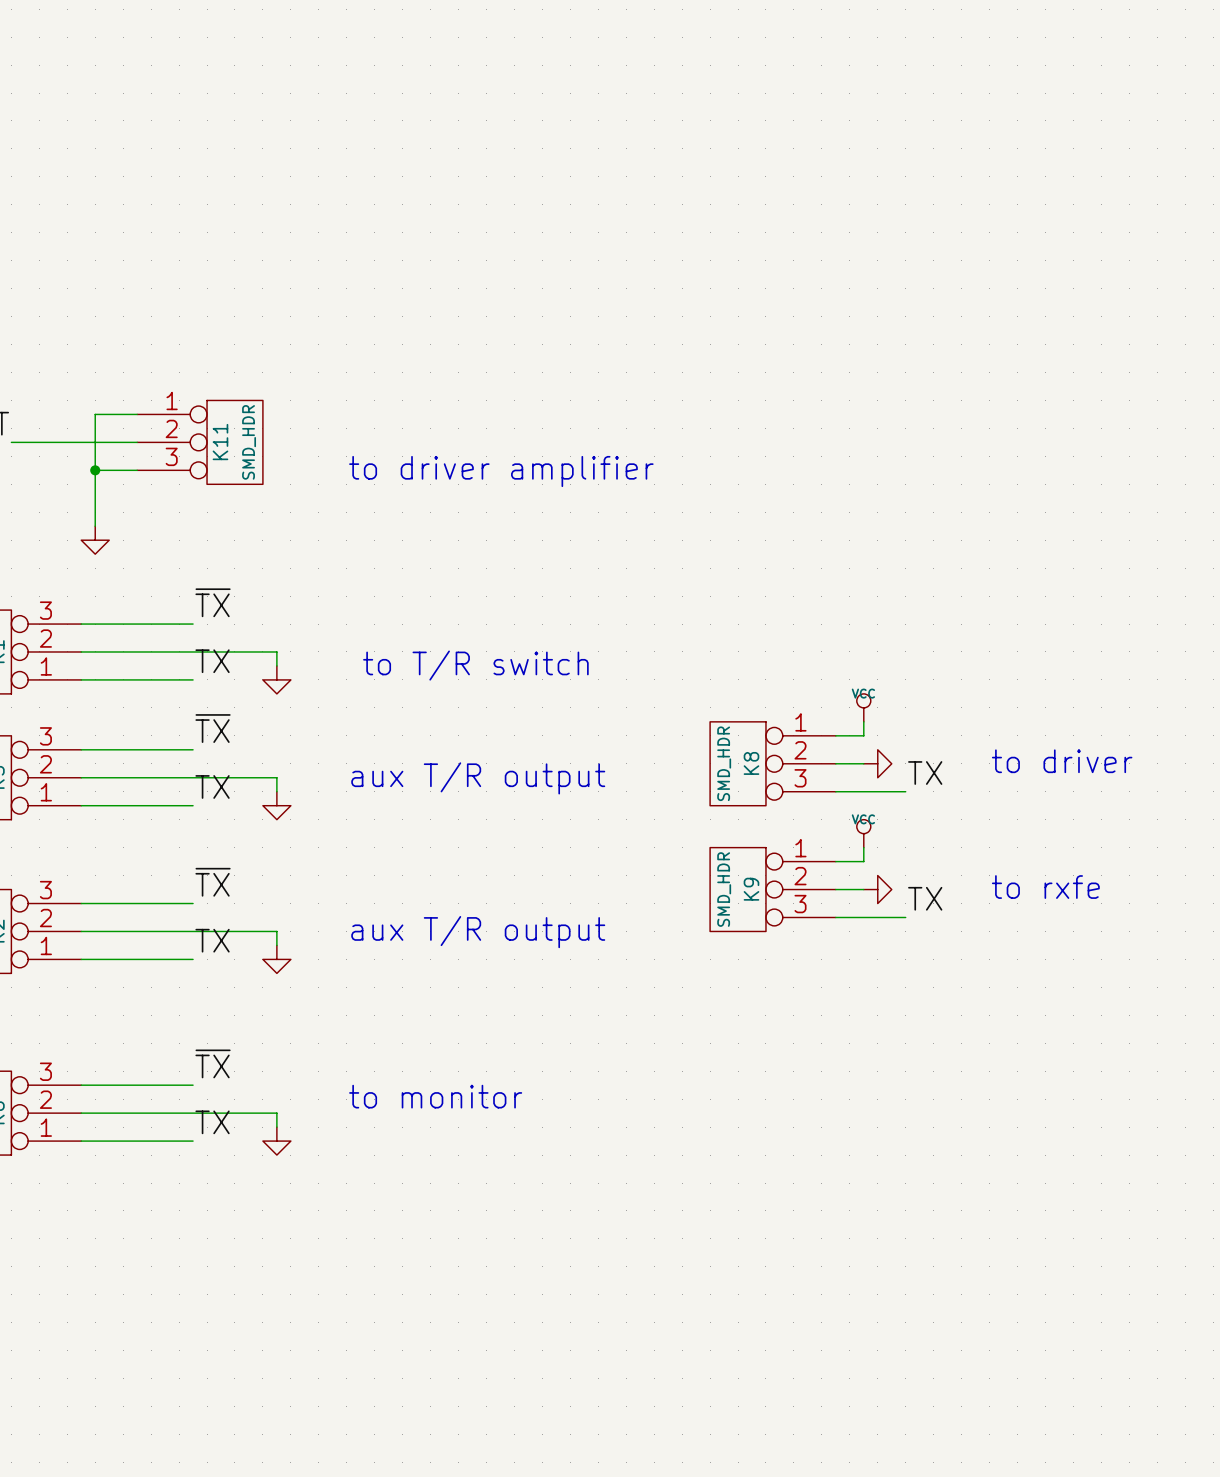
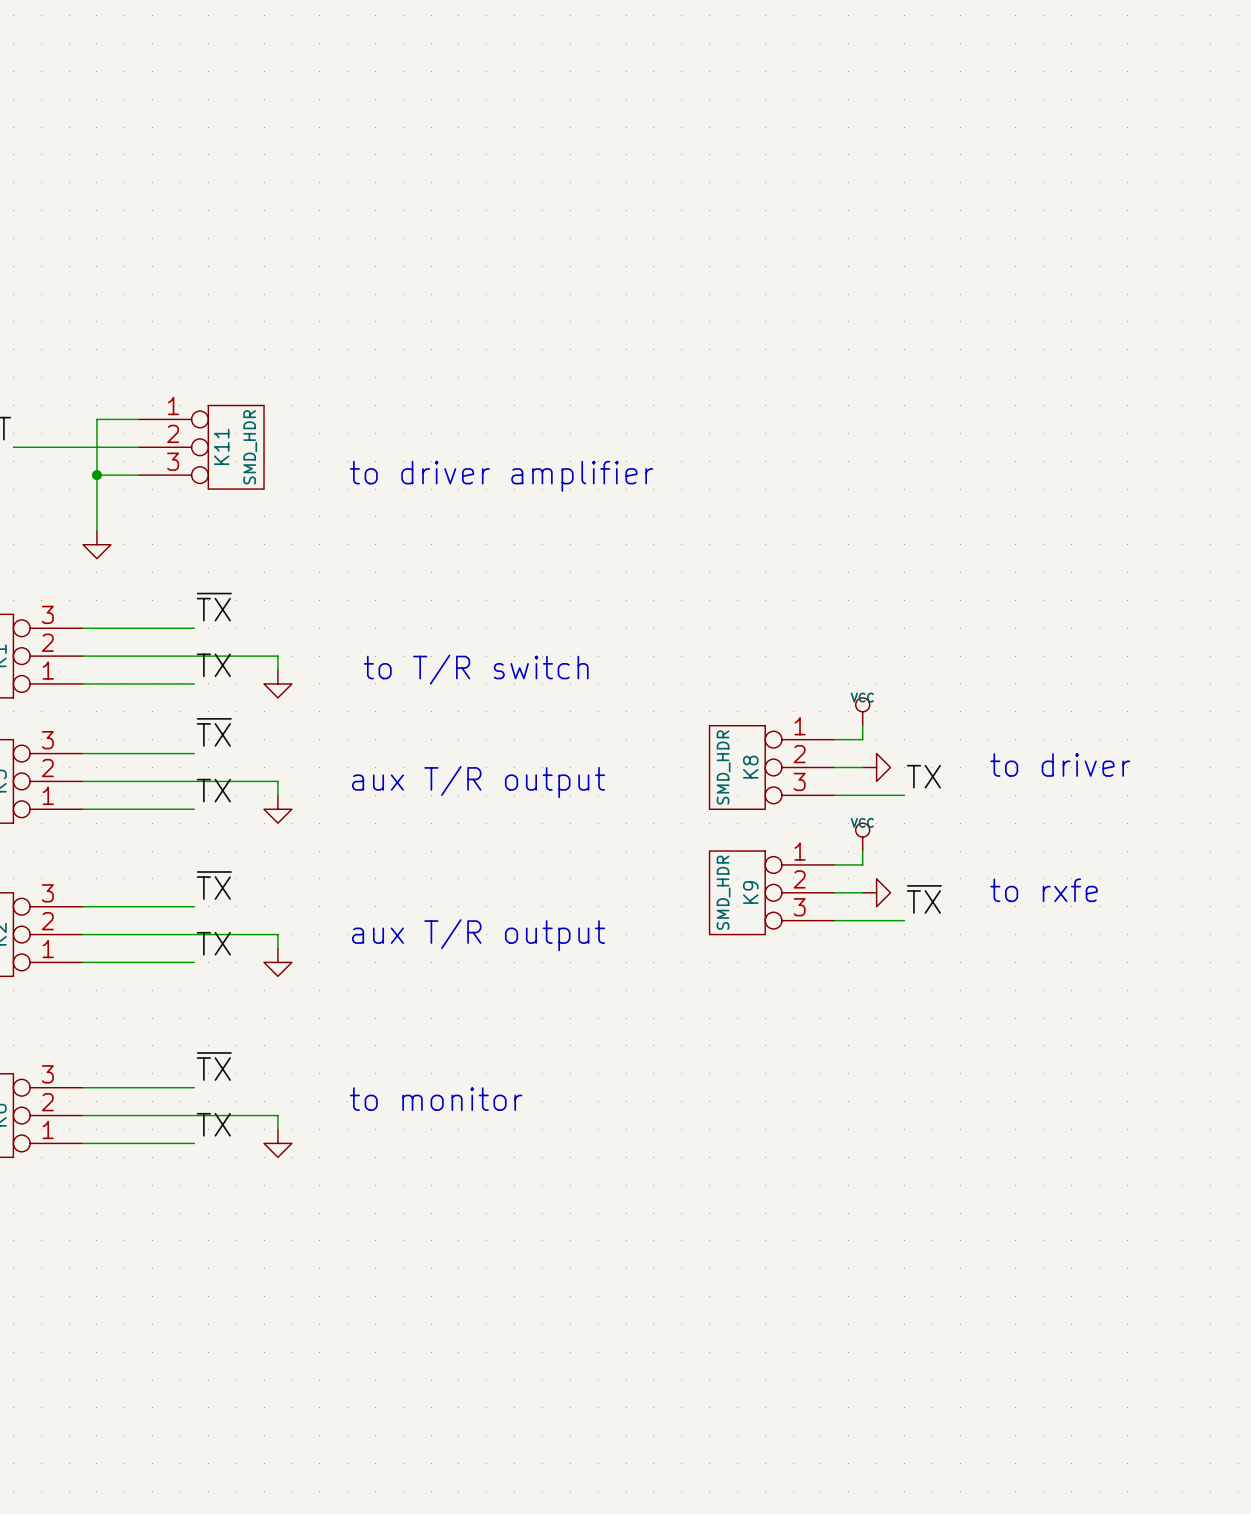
label: TX (925, 898) -> ~{TX} (924, 899)

